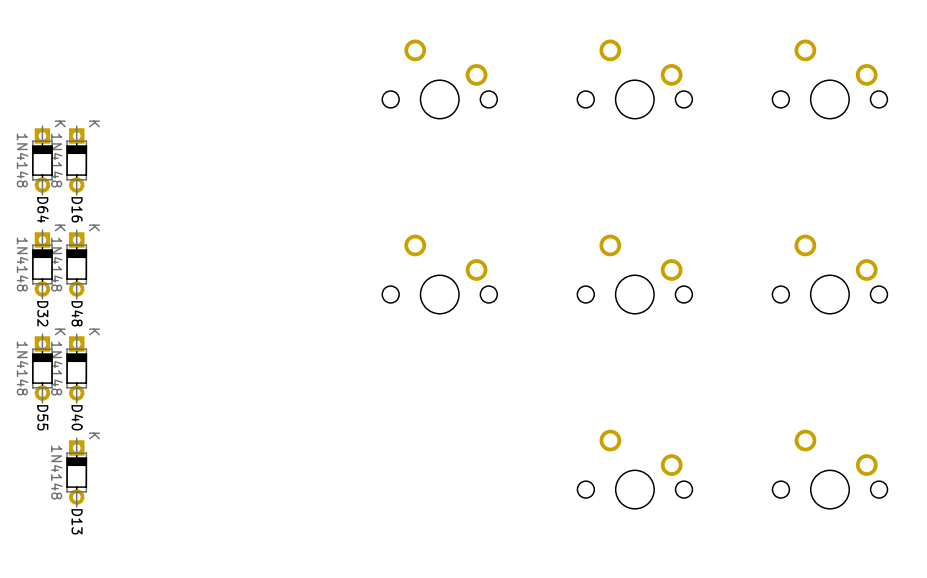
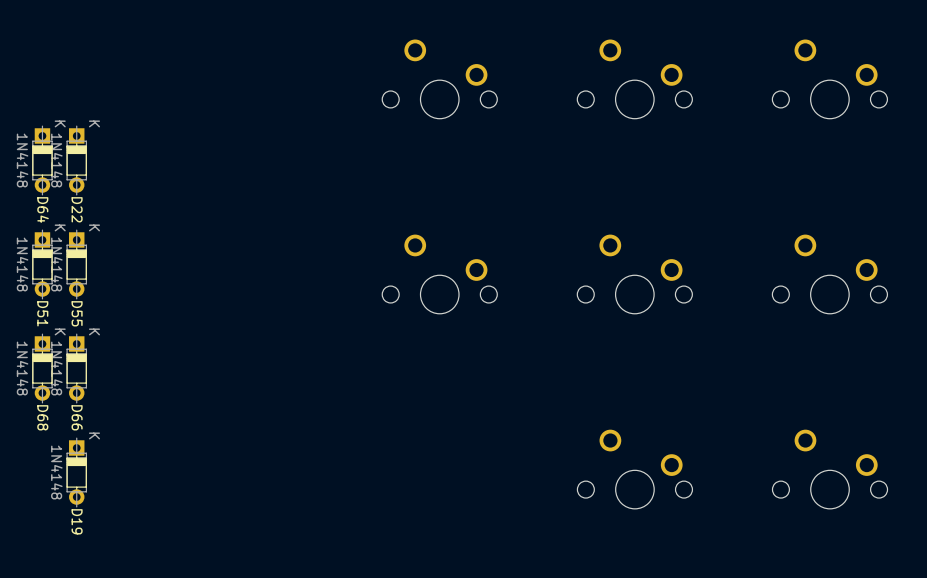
D16 name: D16 (77, 209) -> D22 (77, 209)
D32 name: D32 (42, 313) -> D51 (42, 313)
D48 name: D48 (77, 313) -> D55 (77, 313)
D55 name: D55 (42, 417) -> D68 (42, 417)
D40 name: D40 (77, 417) -> D66 (77, 417)
D13 name: D13 (77, 521) -> D19 (77, 521)

